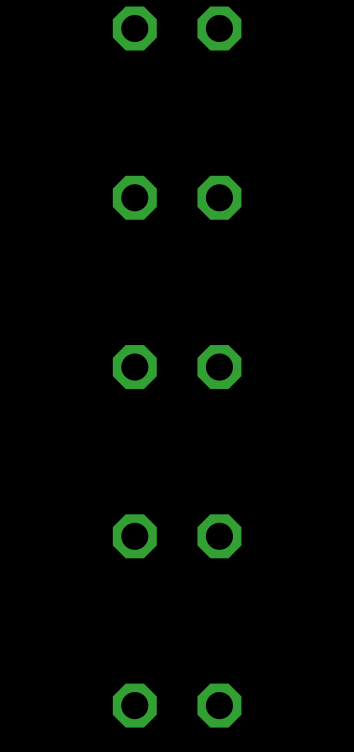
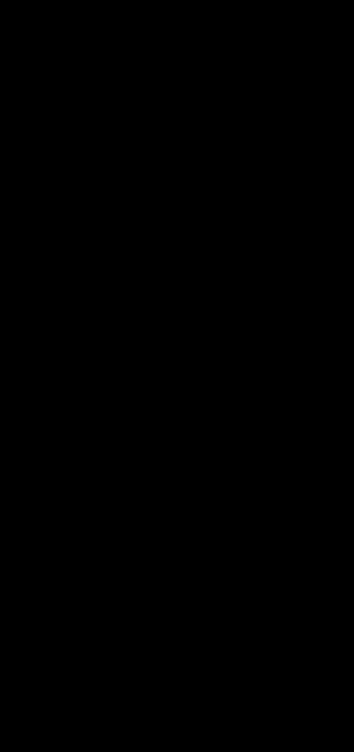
part: (177, 28) -> none
part: (177, 197) -> none
part: (177, 367) -> none
part: (177, 536) -> none
part: (177, 705) -> none

